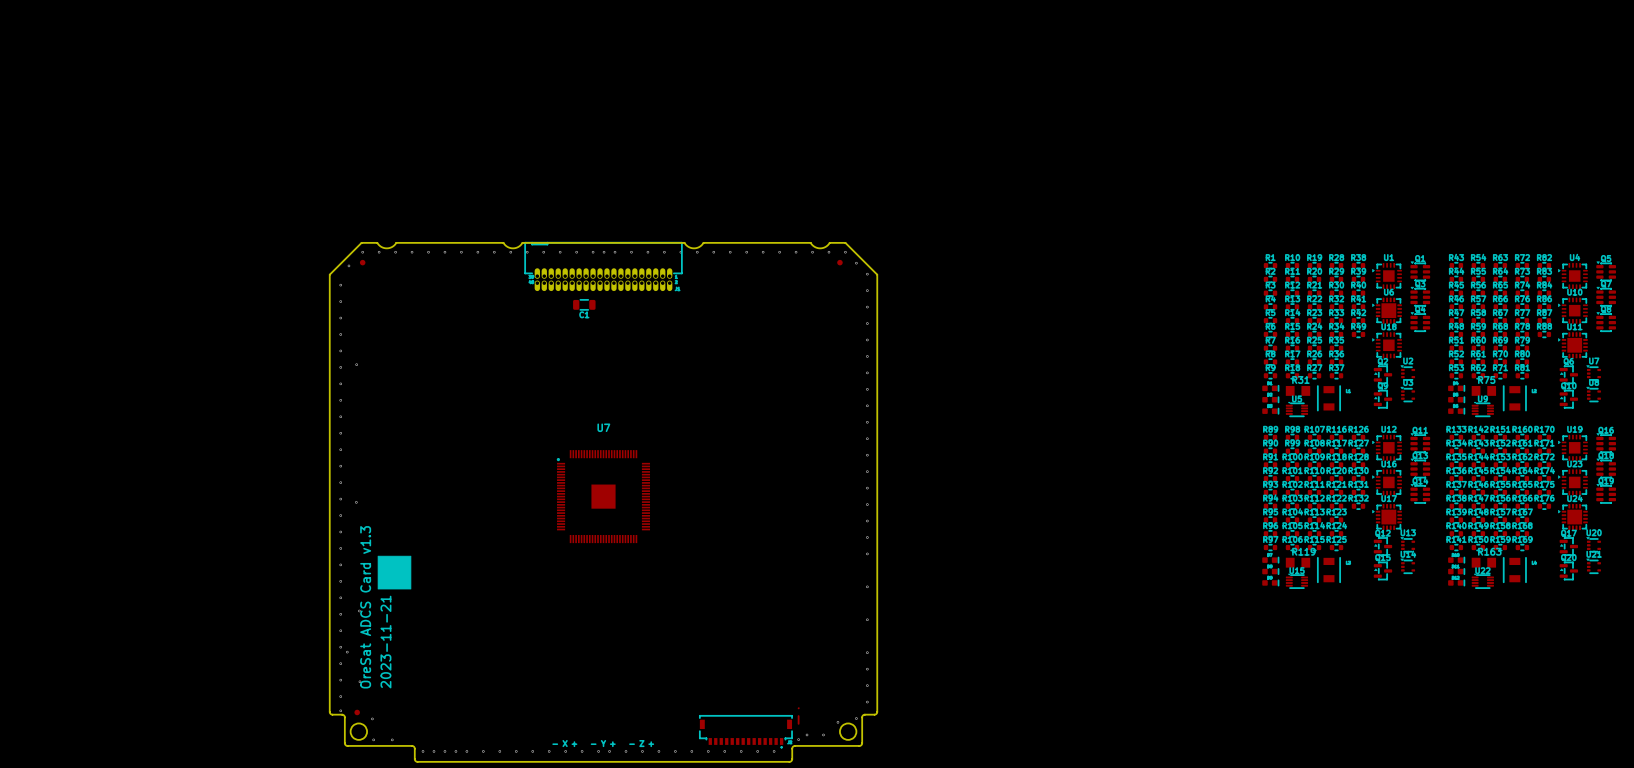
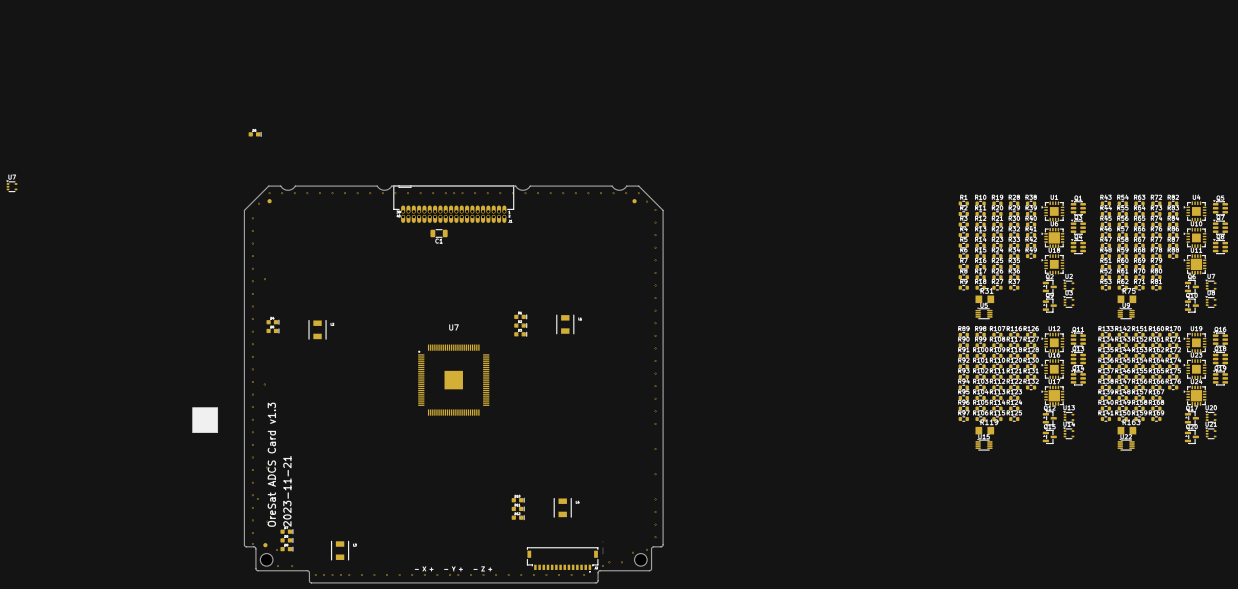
part: none -> (11, 186)
part position: (1270, 388) -> (520, 316)
part position: (1456, 388) -> (272, 322)
part position: (1328, 398) -> (565, 324)
part position: (1514, 398) -> (317, 329)
part position: (1270, 399) -> (520, 325)
part position: (1456, 399) -> (272, 330)
part position: (1270, 411) -> (520, 334)
part position: (1456, 411) -> (254, 134)
part position: (1270, 560) -> (286, 531)
part position: (1456, 560) -> (518, 500)
part position: (1328, 570) -> (340, 550)
part position: (1514, 570) -> (562, 507)
part position: (1270, 571) -> (286, 540)
part position: (1456, 571) -> (518, 508)
drawing position: (394, 572) -> (205, 420)
part position: (1270, 582) -> (286, 549)
part position: (1456, 582) -> (518, 517)

